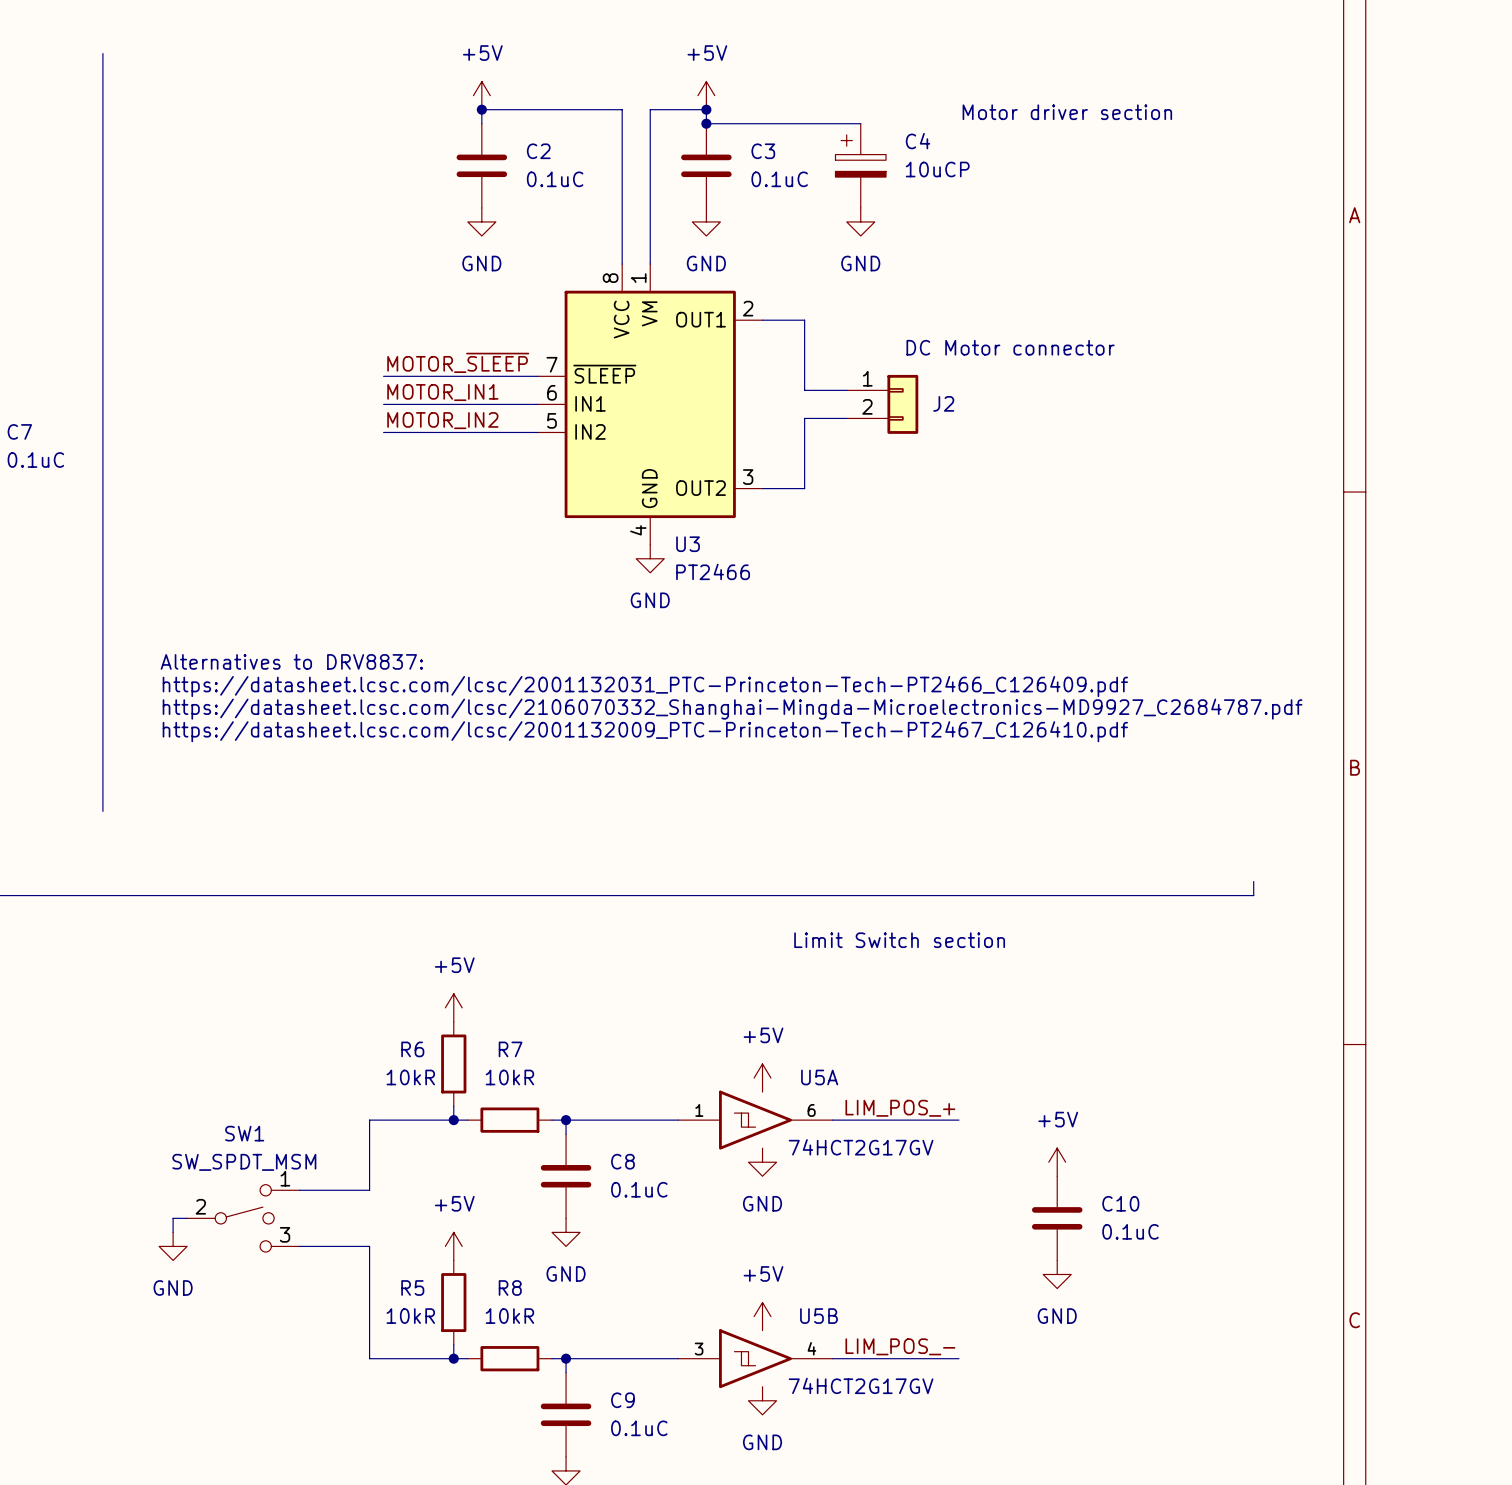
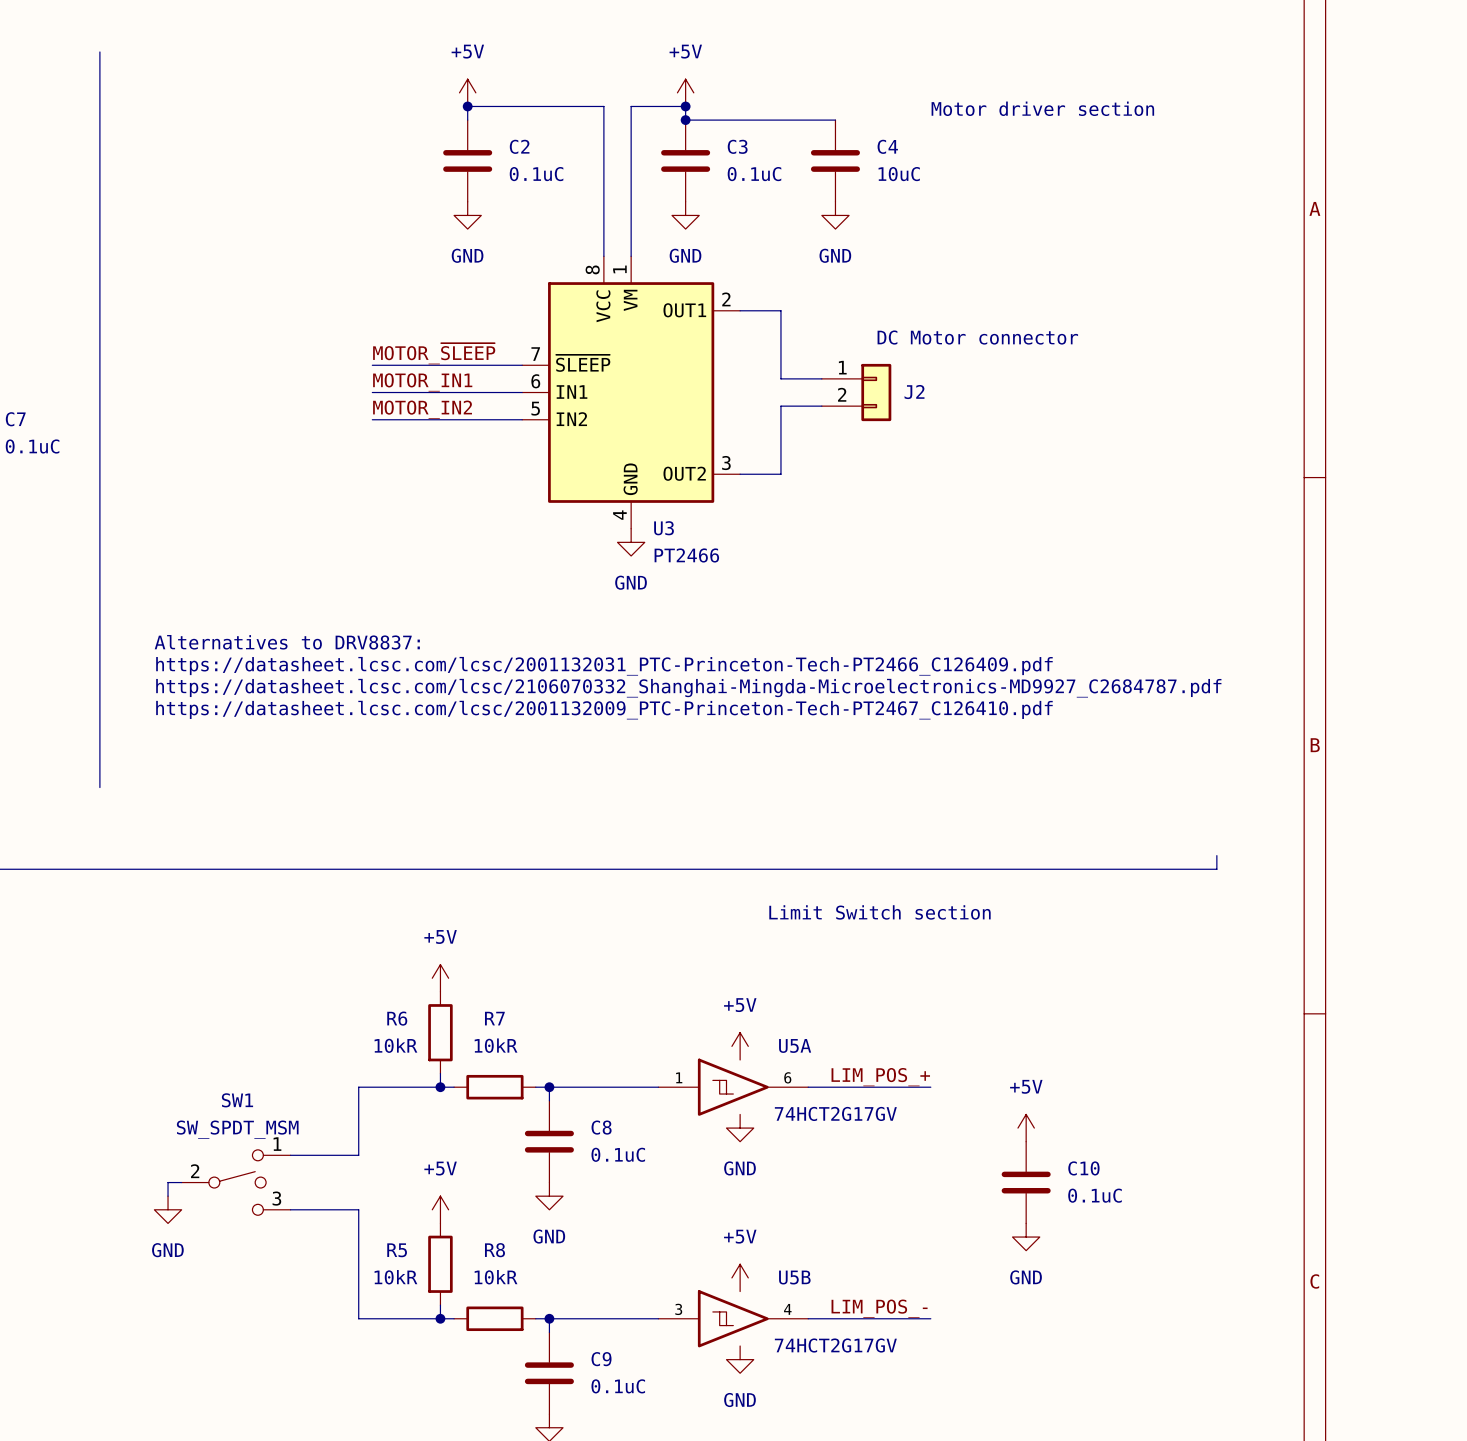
C4 symbol: [835, 123, 887, 208] -> [810, 120, 860, 202]
C4 value: 10uCP (937, 169) -> 10uC (899, 174)

